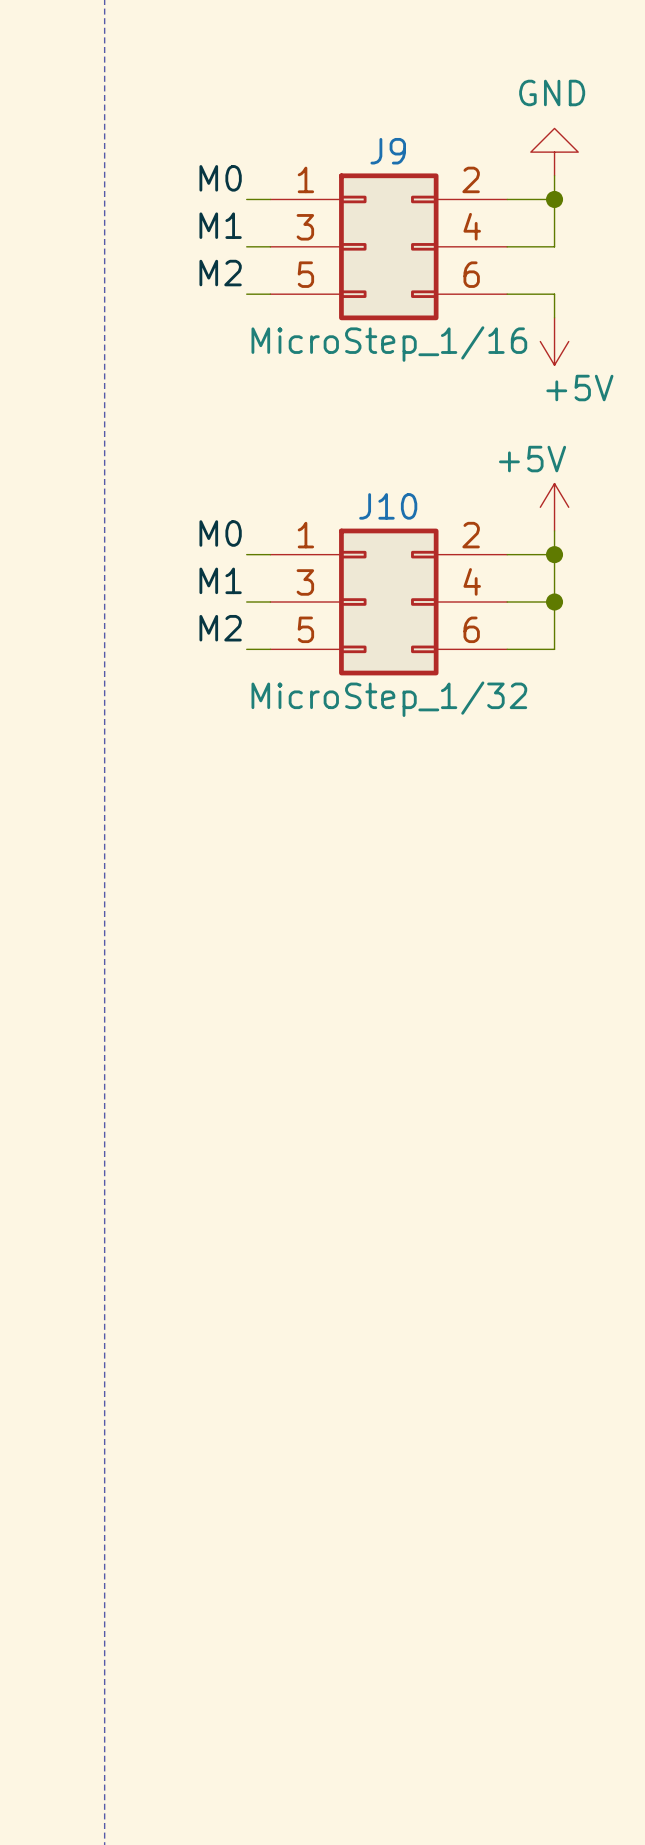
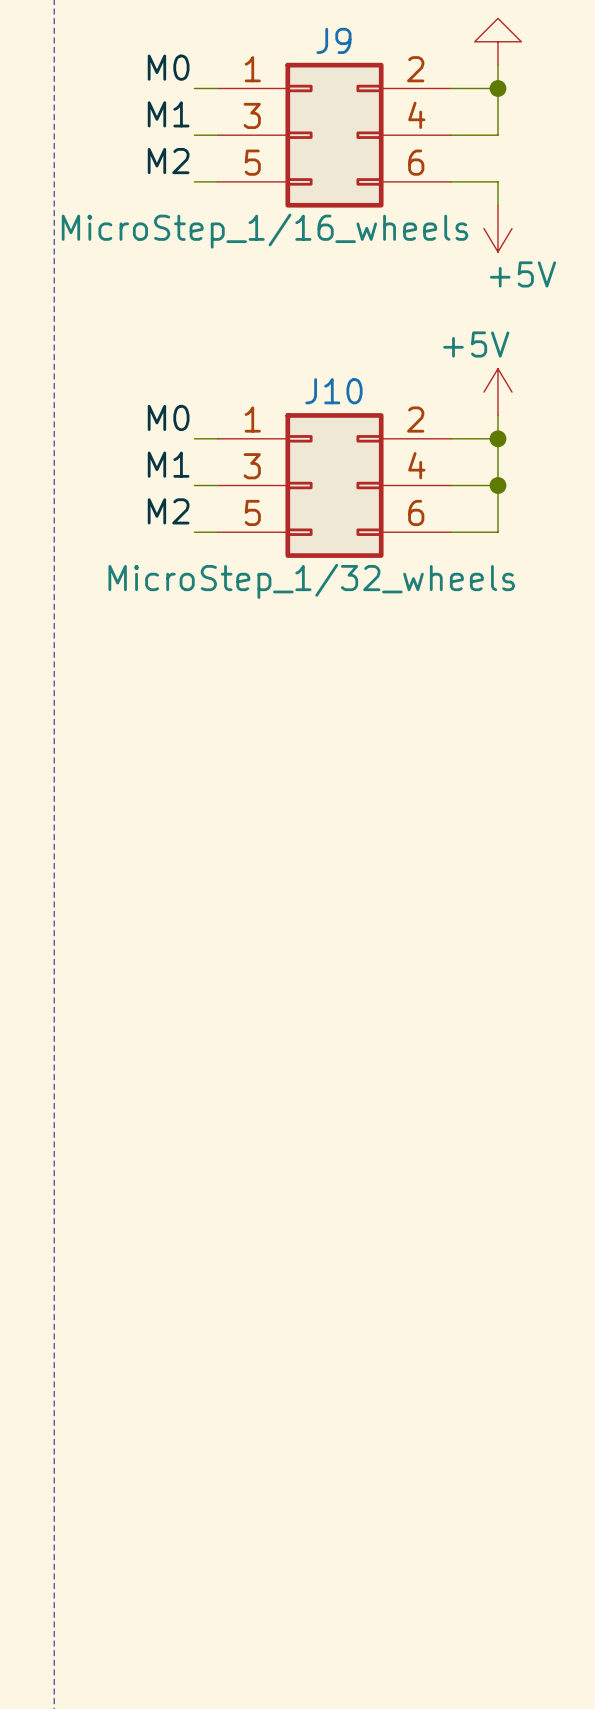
J9 value: MicroStep_1/16 (389, 344) -> MicroStep_1/16_wheels (265, 231)
J10 value: MicroStep_1/32 (389, 699) -> MicroStep_1/32_wheels (311, 581)

